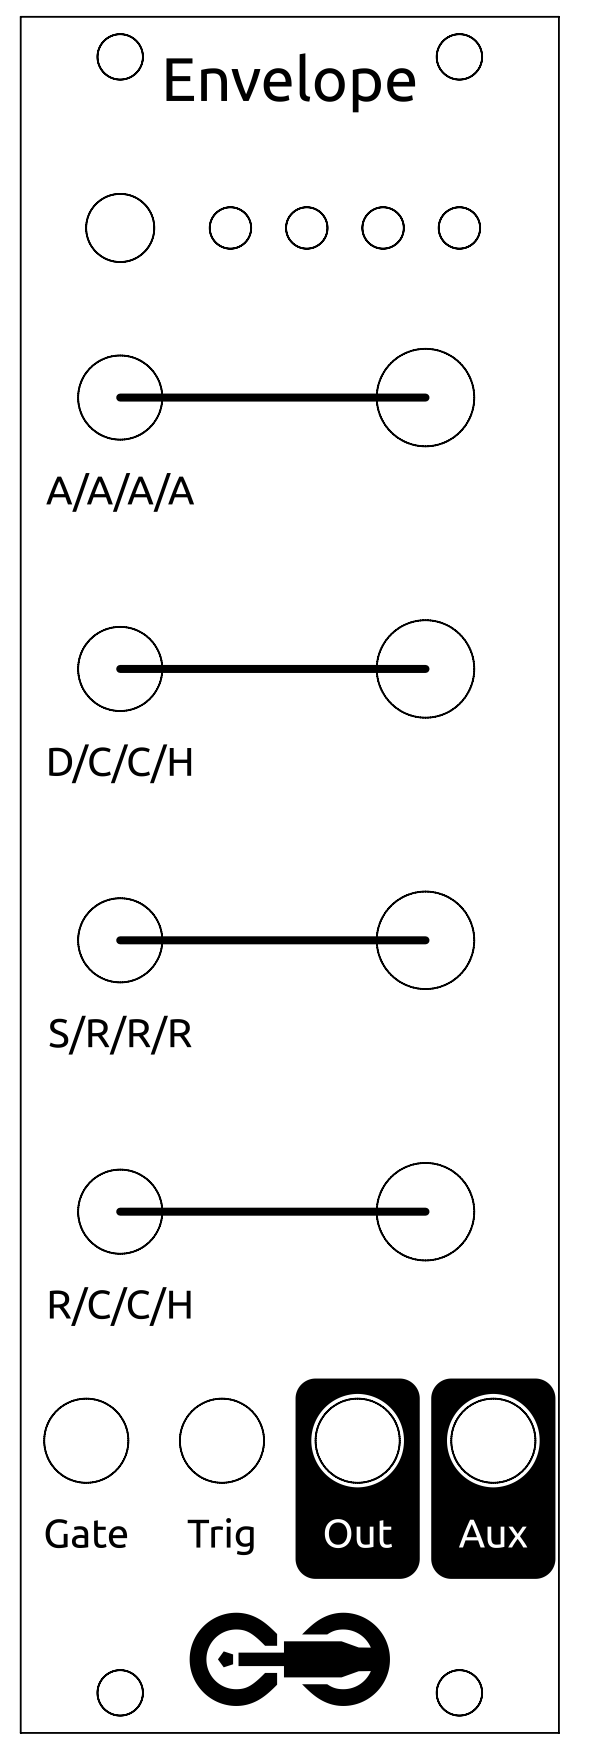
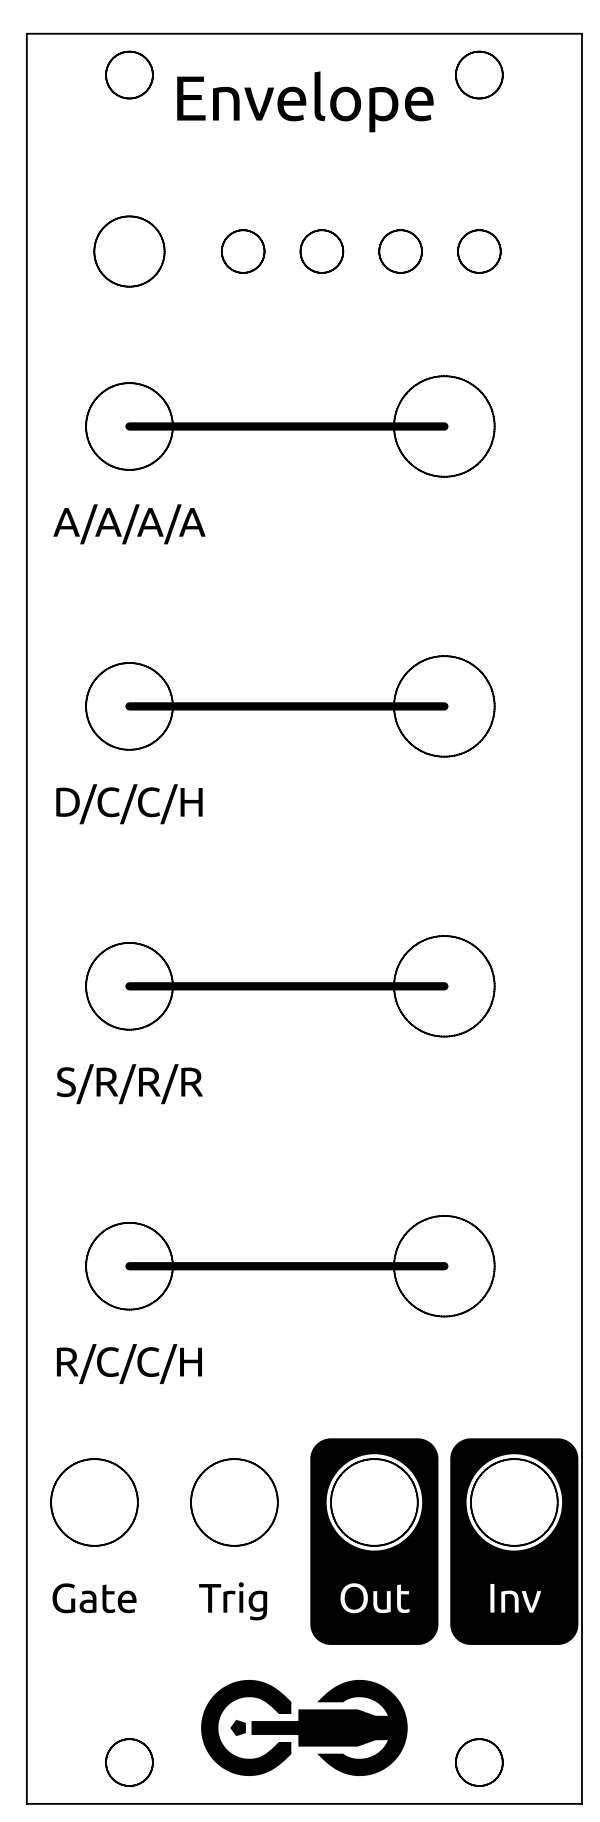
drawing shape: [431, 1378, 556, 1579] -> [450, 1438, 579, 1645]
drawing: [466, 1524, 477, 1538] -> none

